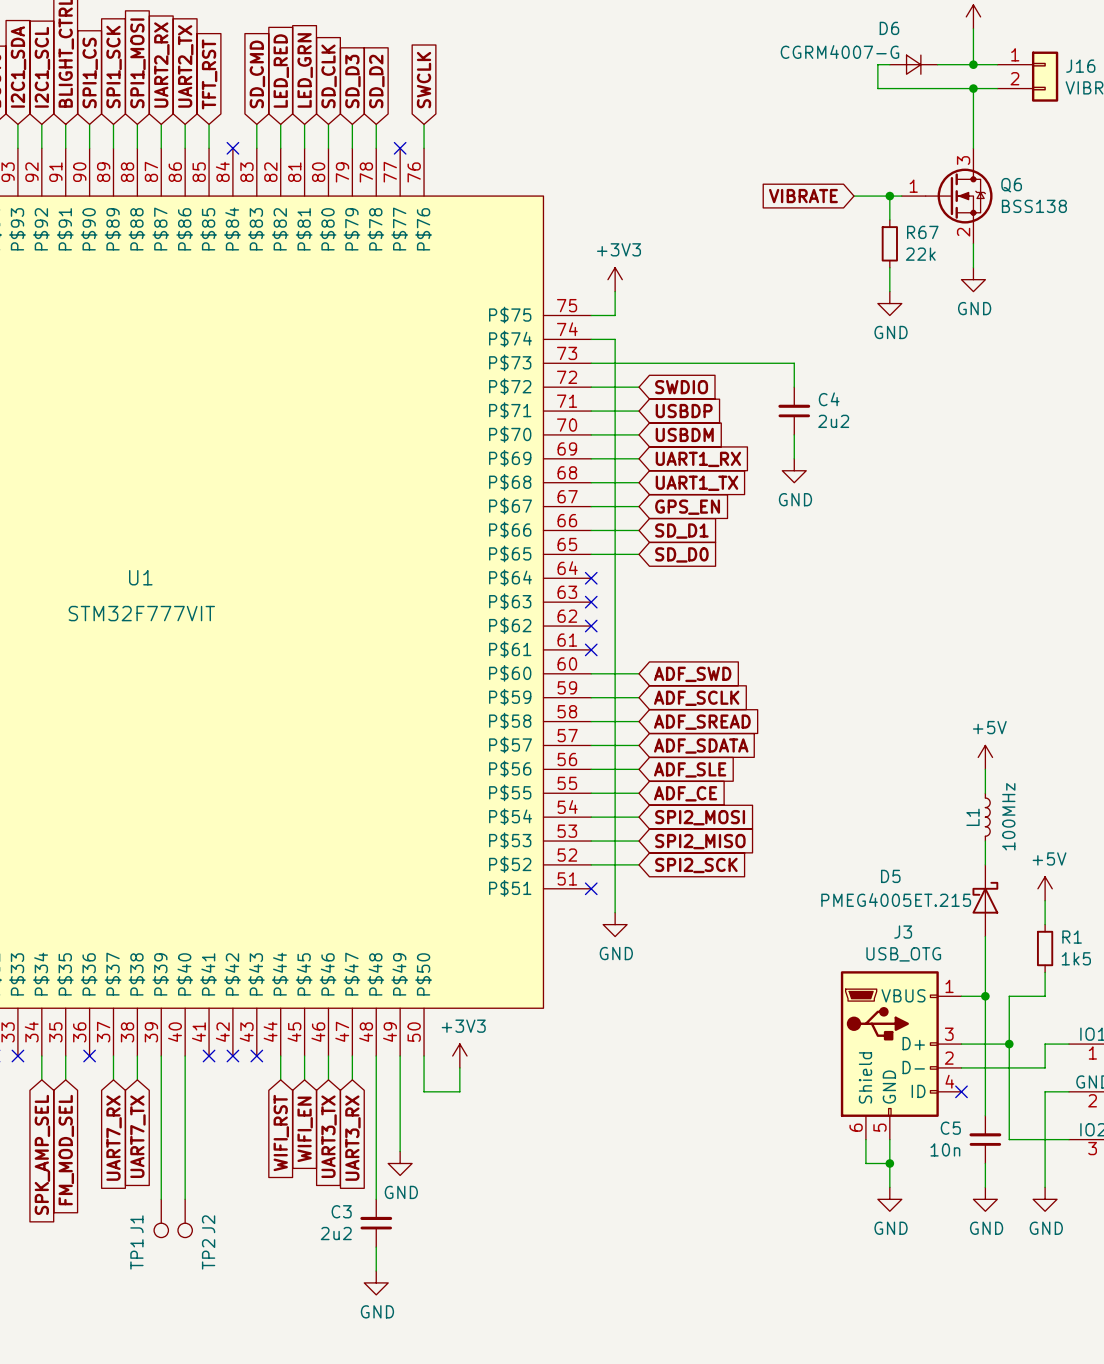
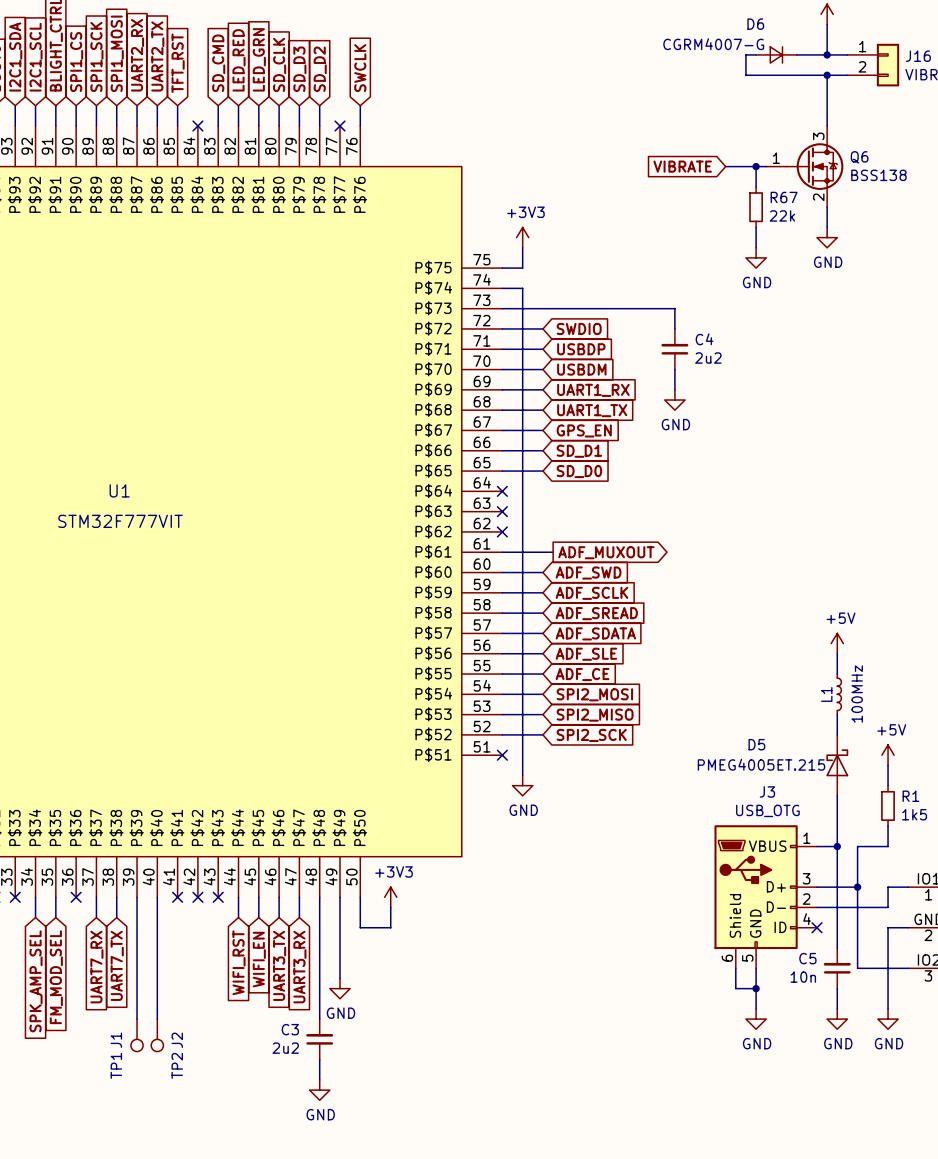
wire: none -> (502, 552) (553, 552)
no-connect mark: (591, 649) -> none
global label: none -> ADF_MUXOUT (606, 552)

